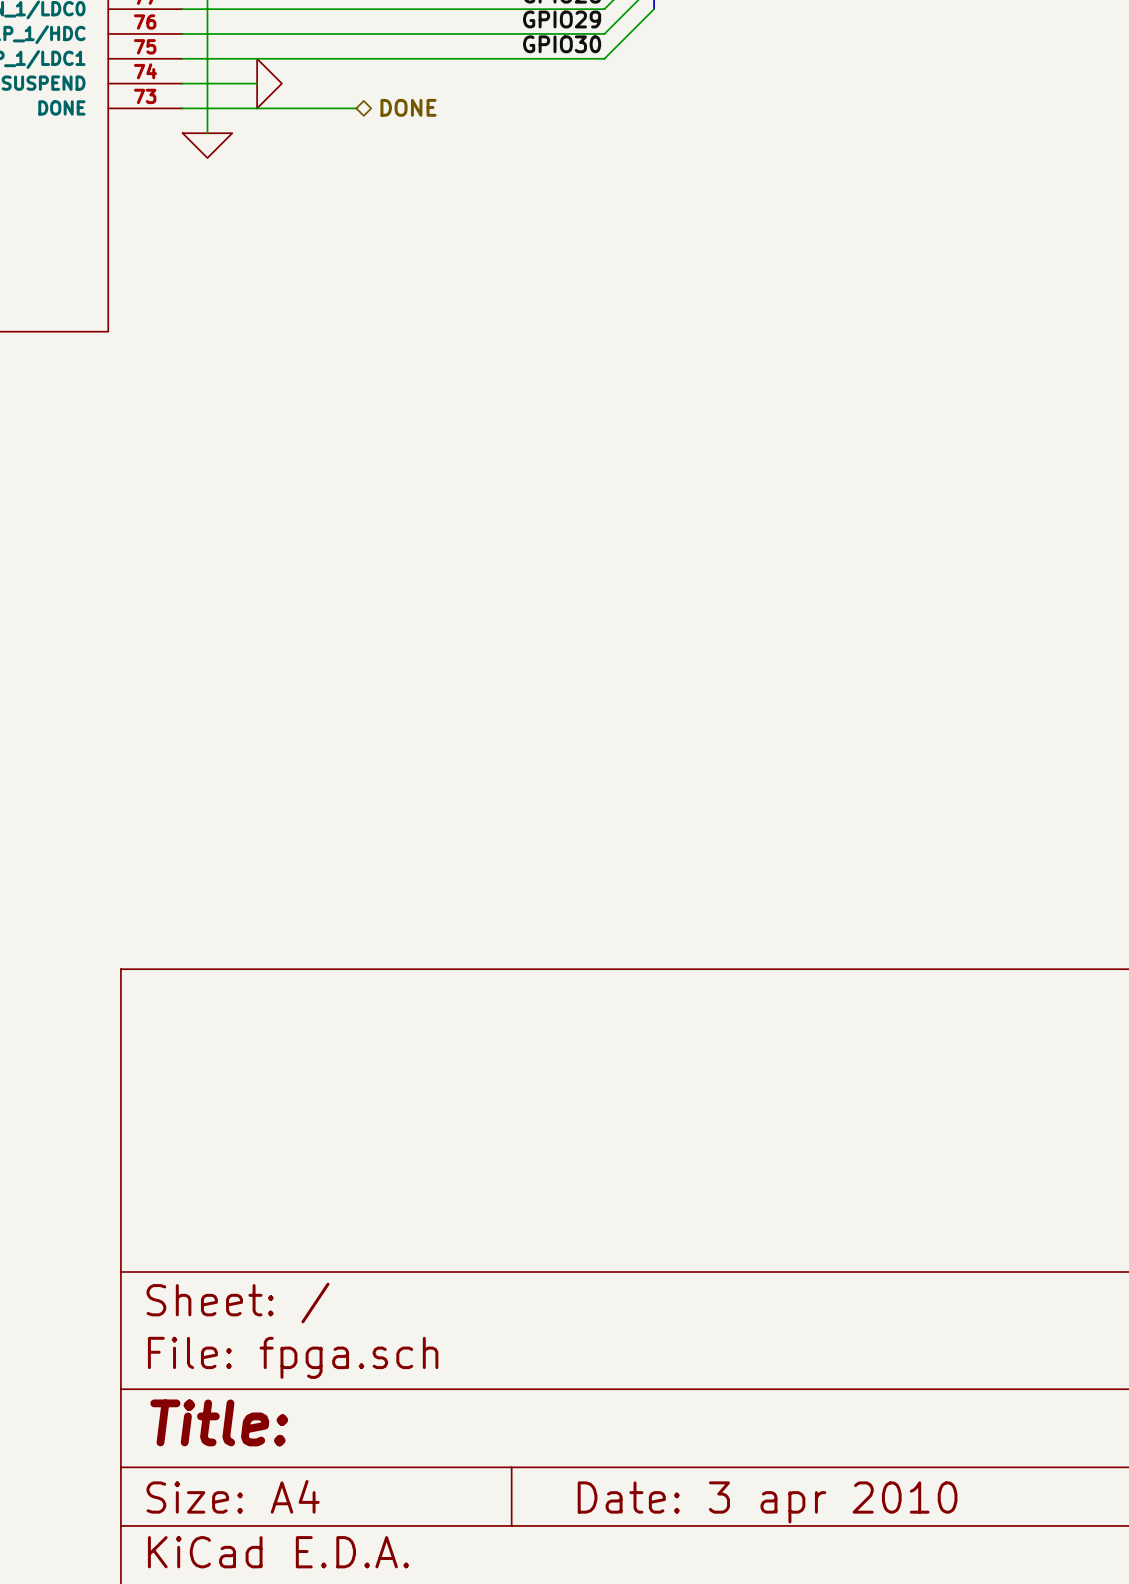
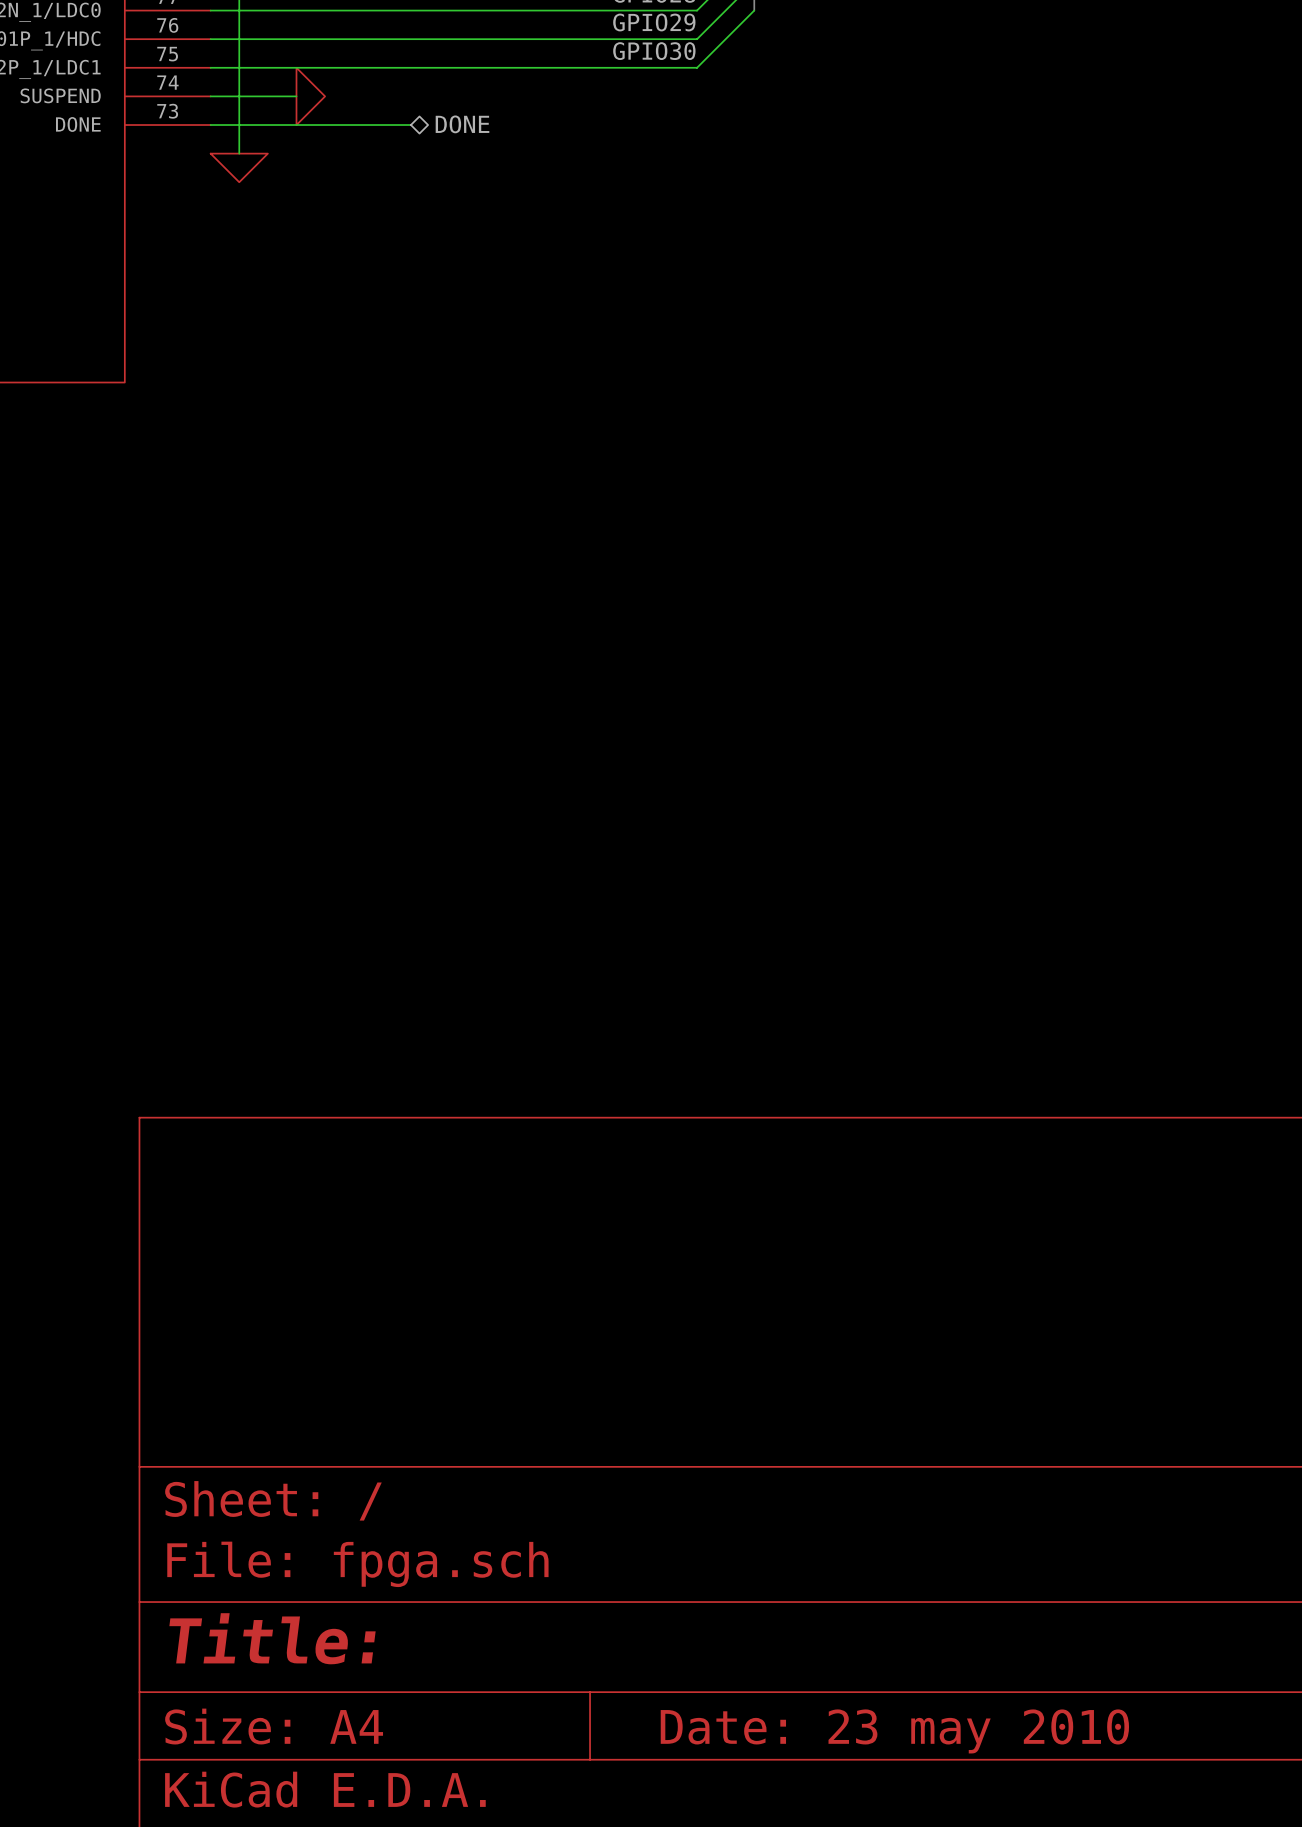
title block: Date: 3 apr 2010 (767, 1502) -> Date: 23 may 2010 (894, 1731)

